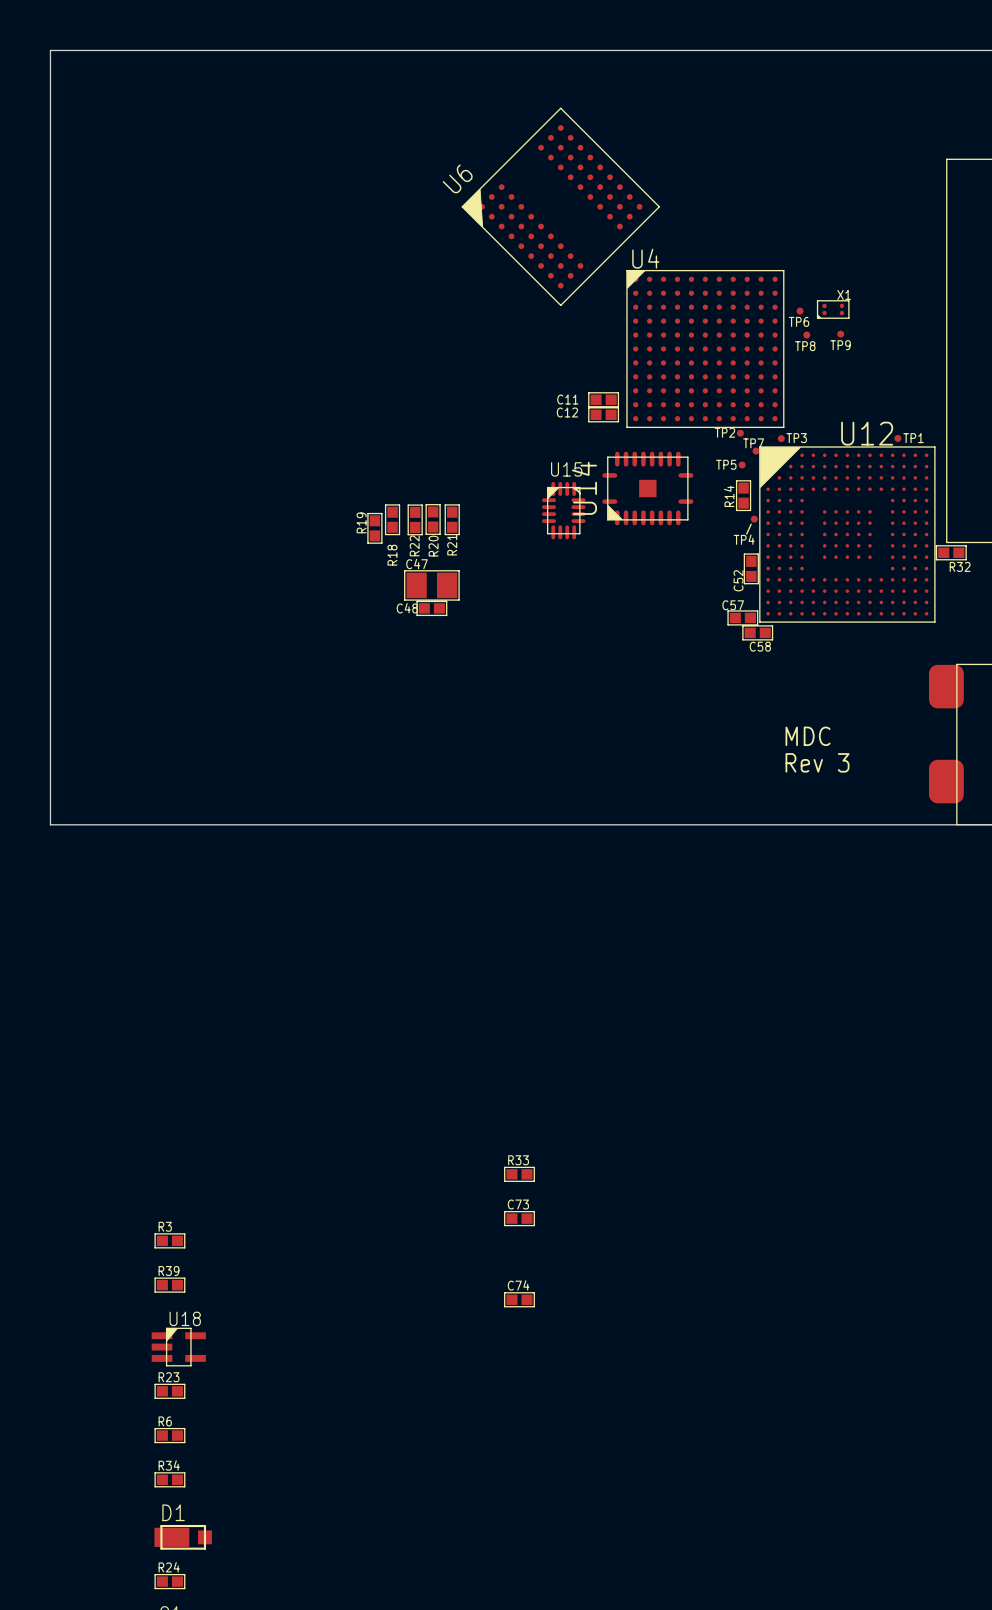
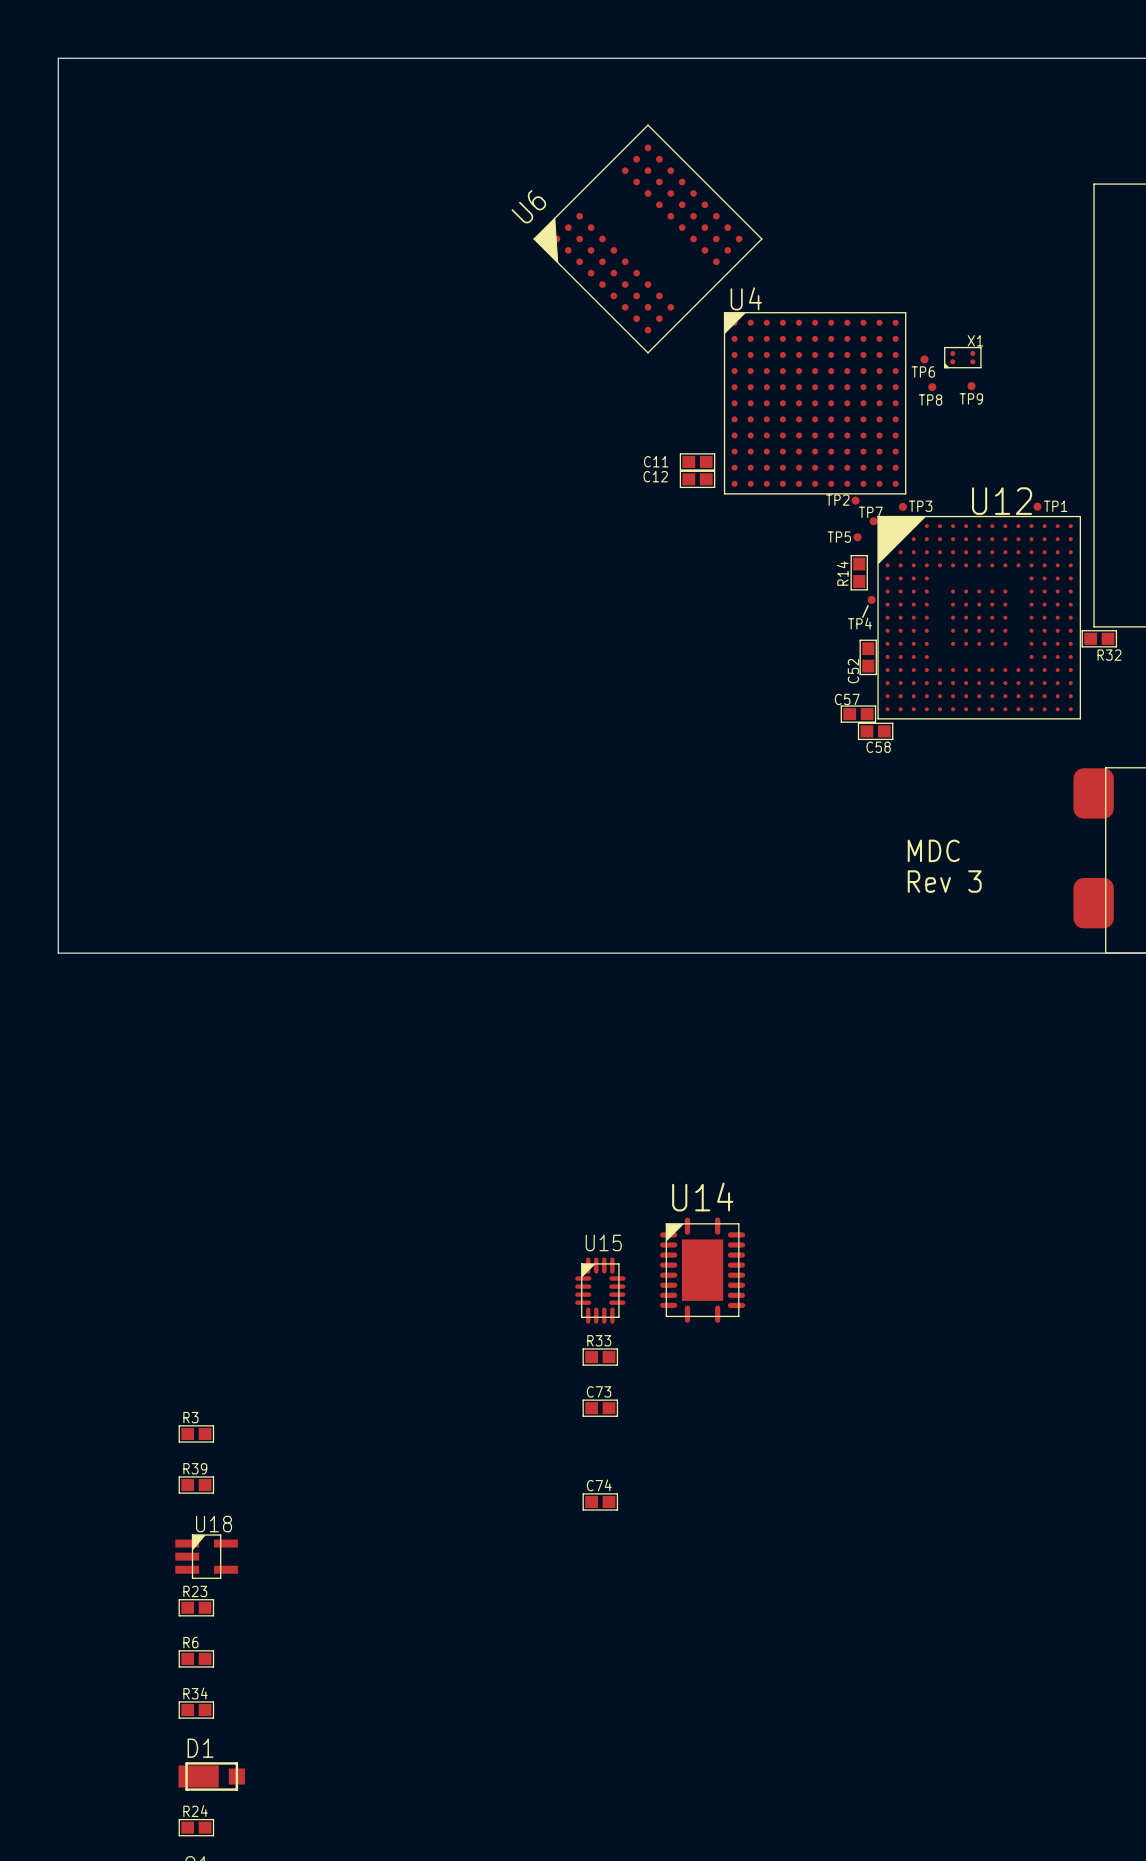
U14 footprint: [602, 451, 694, 526] -> [660, 1217, 746, 1323]
U14 name position: U14 (584, 488) -> U14 (702, 1196)
U15 position: (563, 510) -> (600, 1290)
R18: (392, 519) -> none
R22: (415, 519) -> none
R20: (433, 519) -> none
R21: (452, 519) -> none
R19: (374, 528) -> none
C47: (431, 585) -> none
C48: (431, 608) -> none

